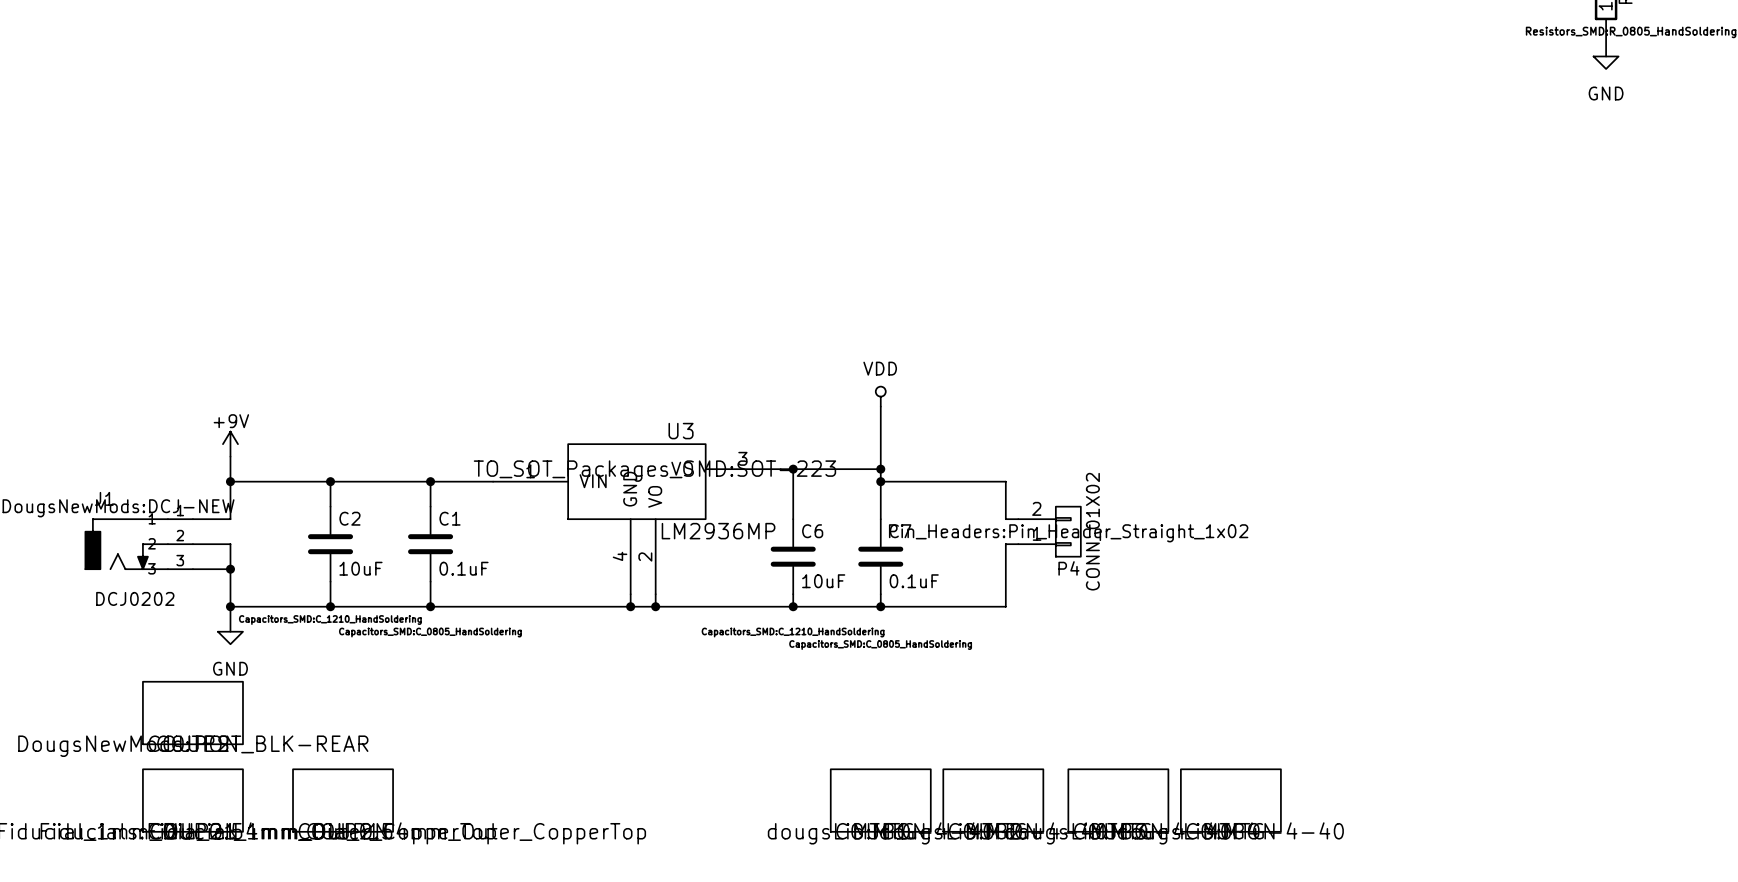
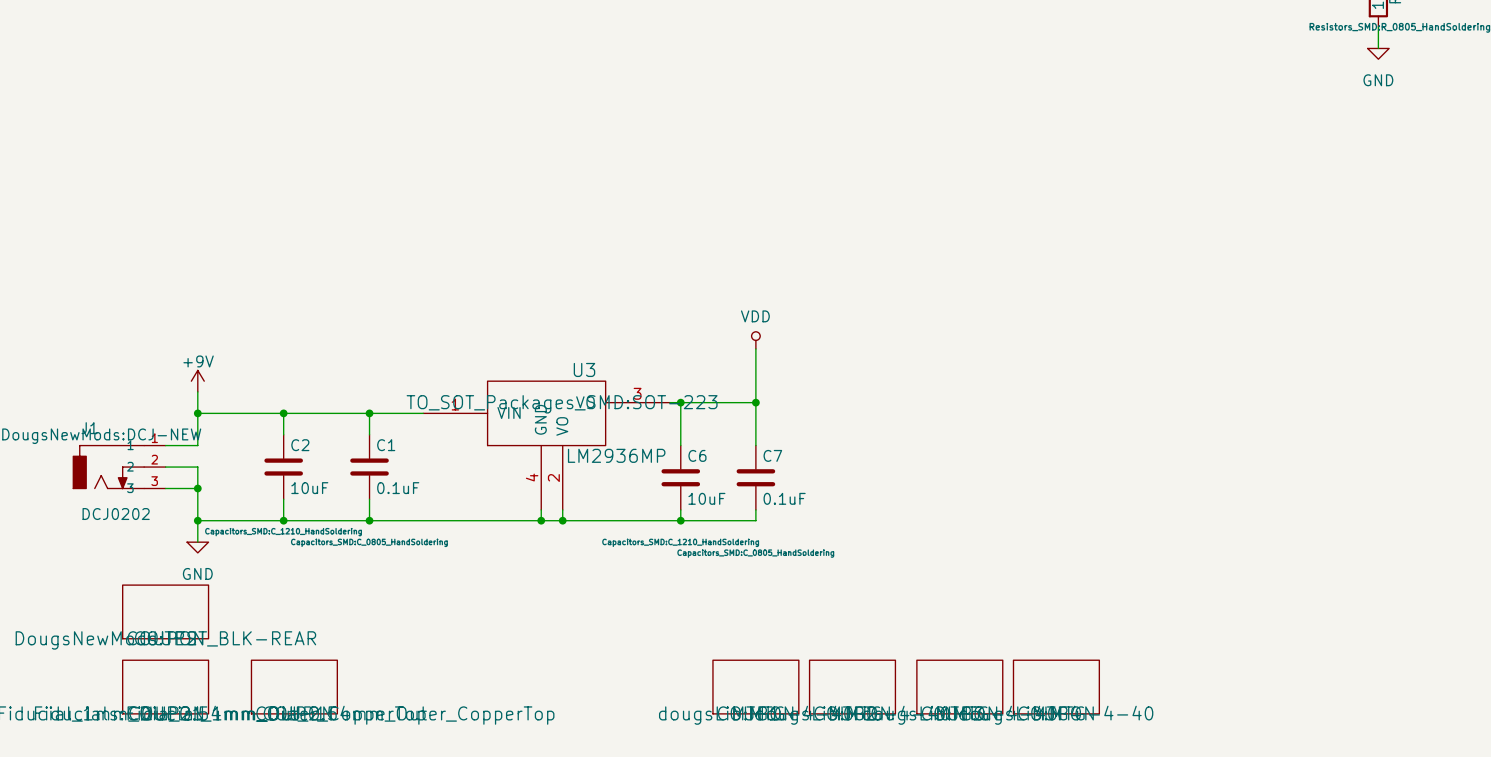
wire: (880, 481) (1005, 481) (1005, 519) (1018, 519) -> none
junction: (880, 481) -> none
P4: CONN_01X02 (1049, 531) -> none
wire: (1018, 544) (1005, 544) (1005, 606) (880, 606) -> none
junction: (880, 606) -> none

